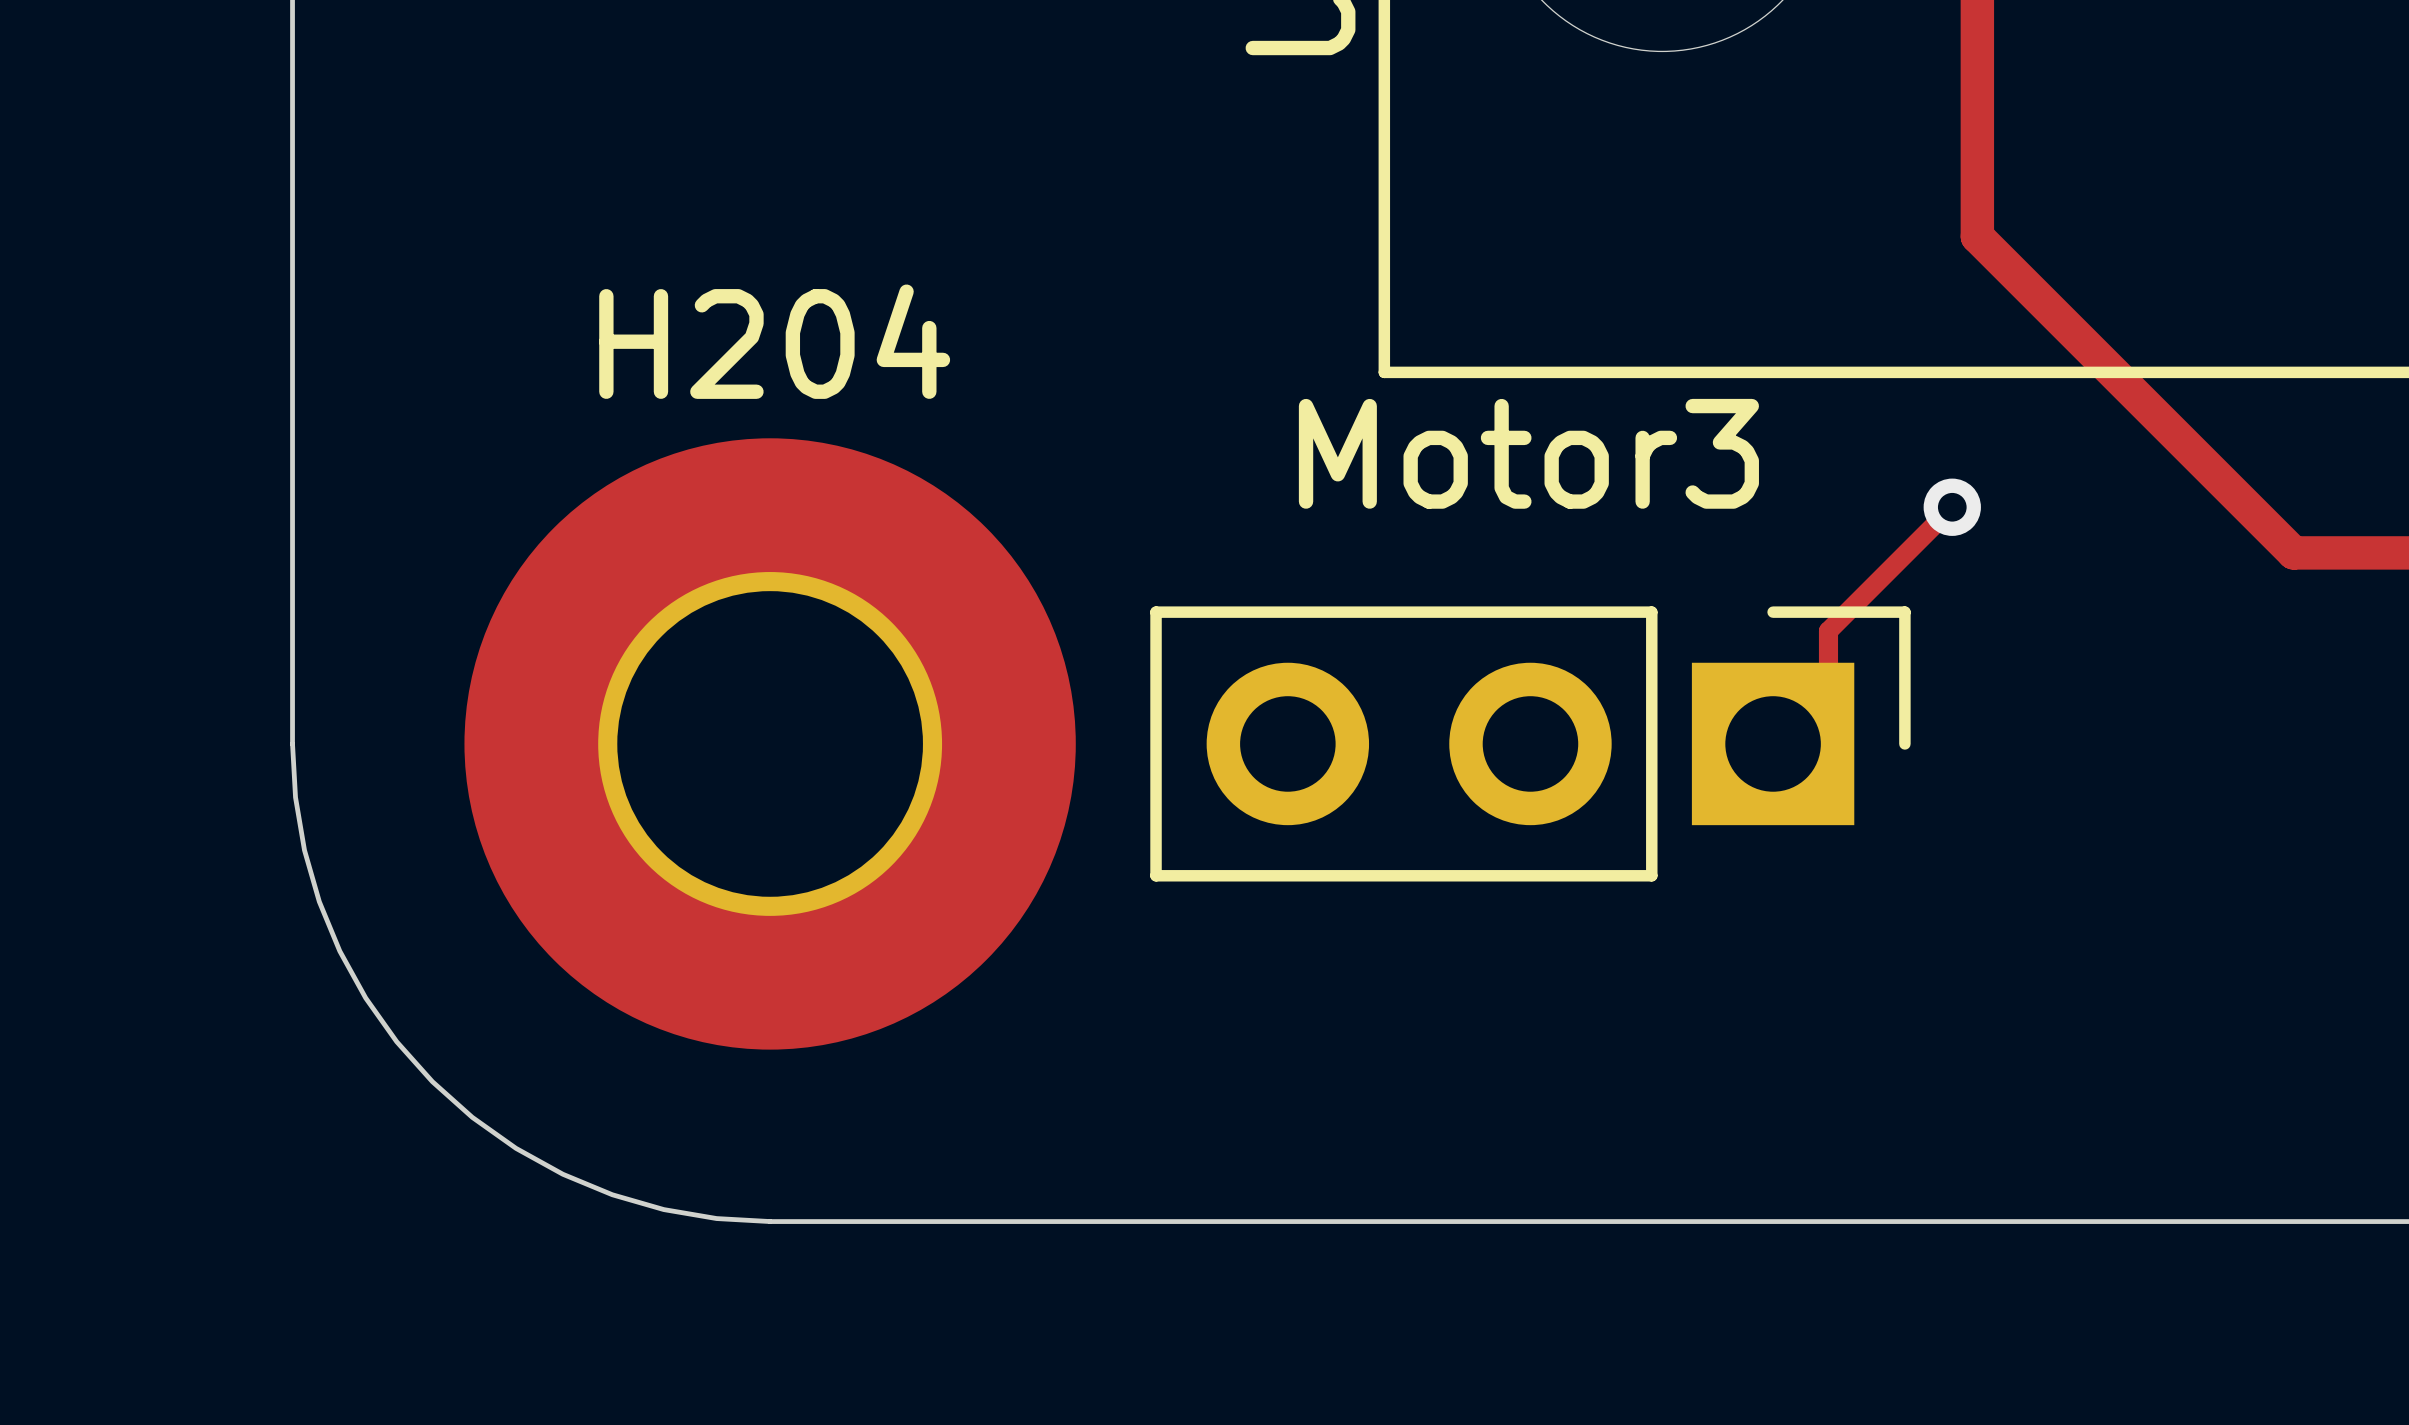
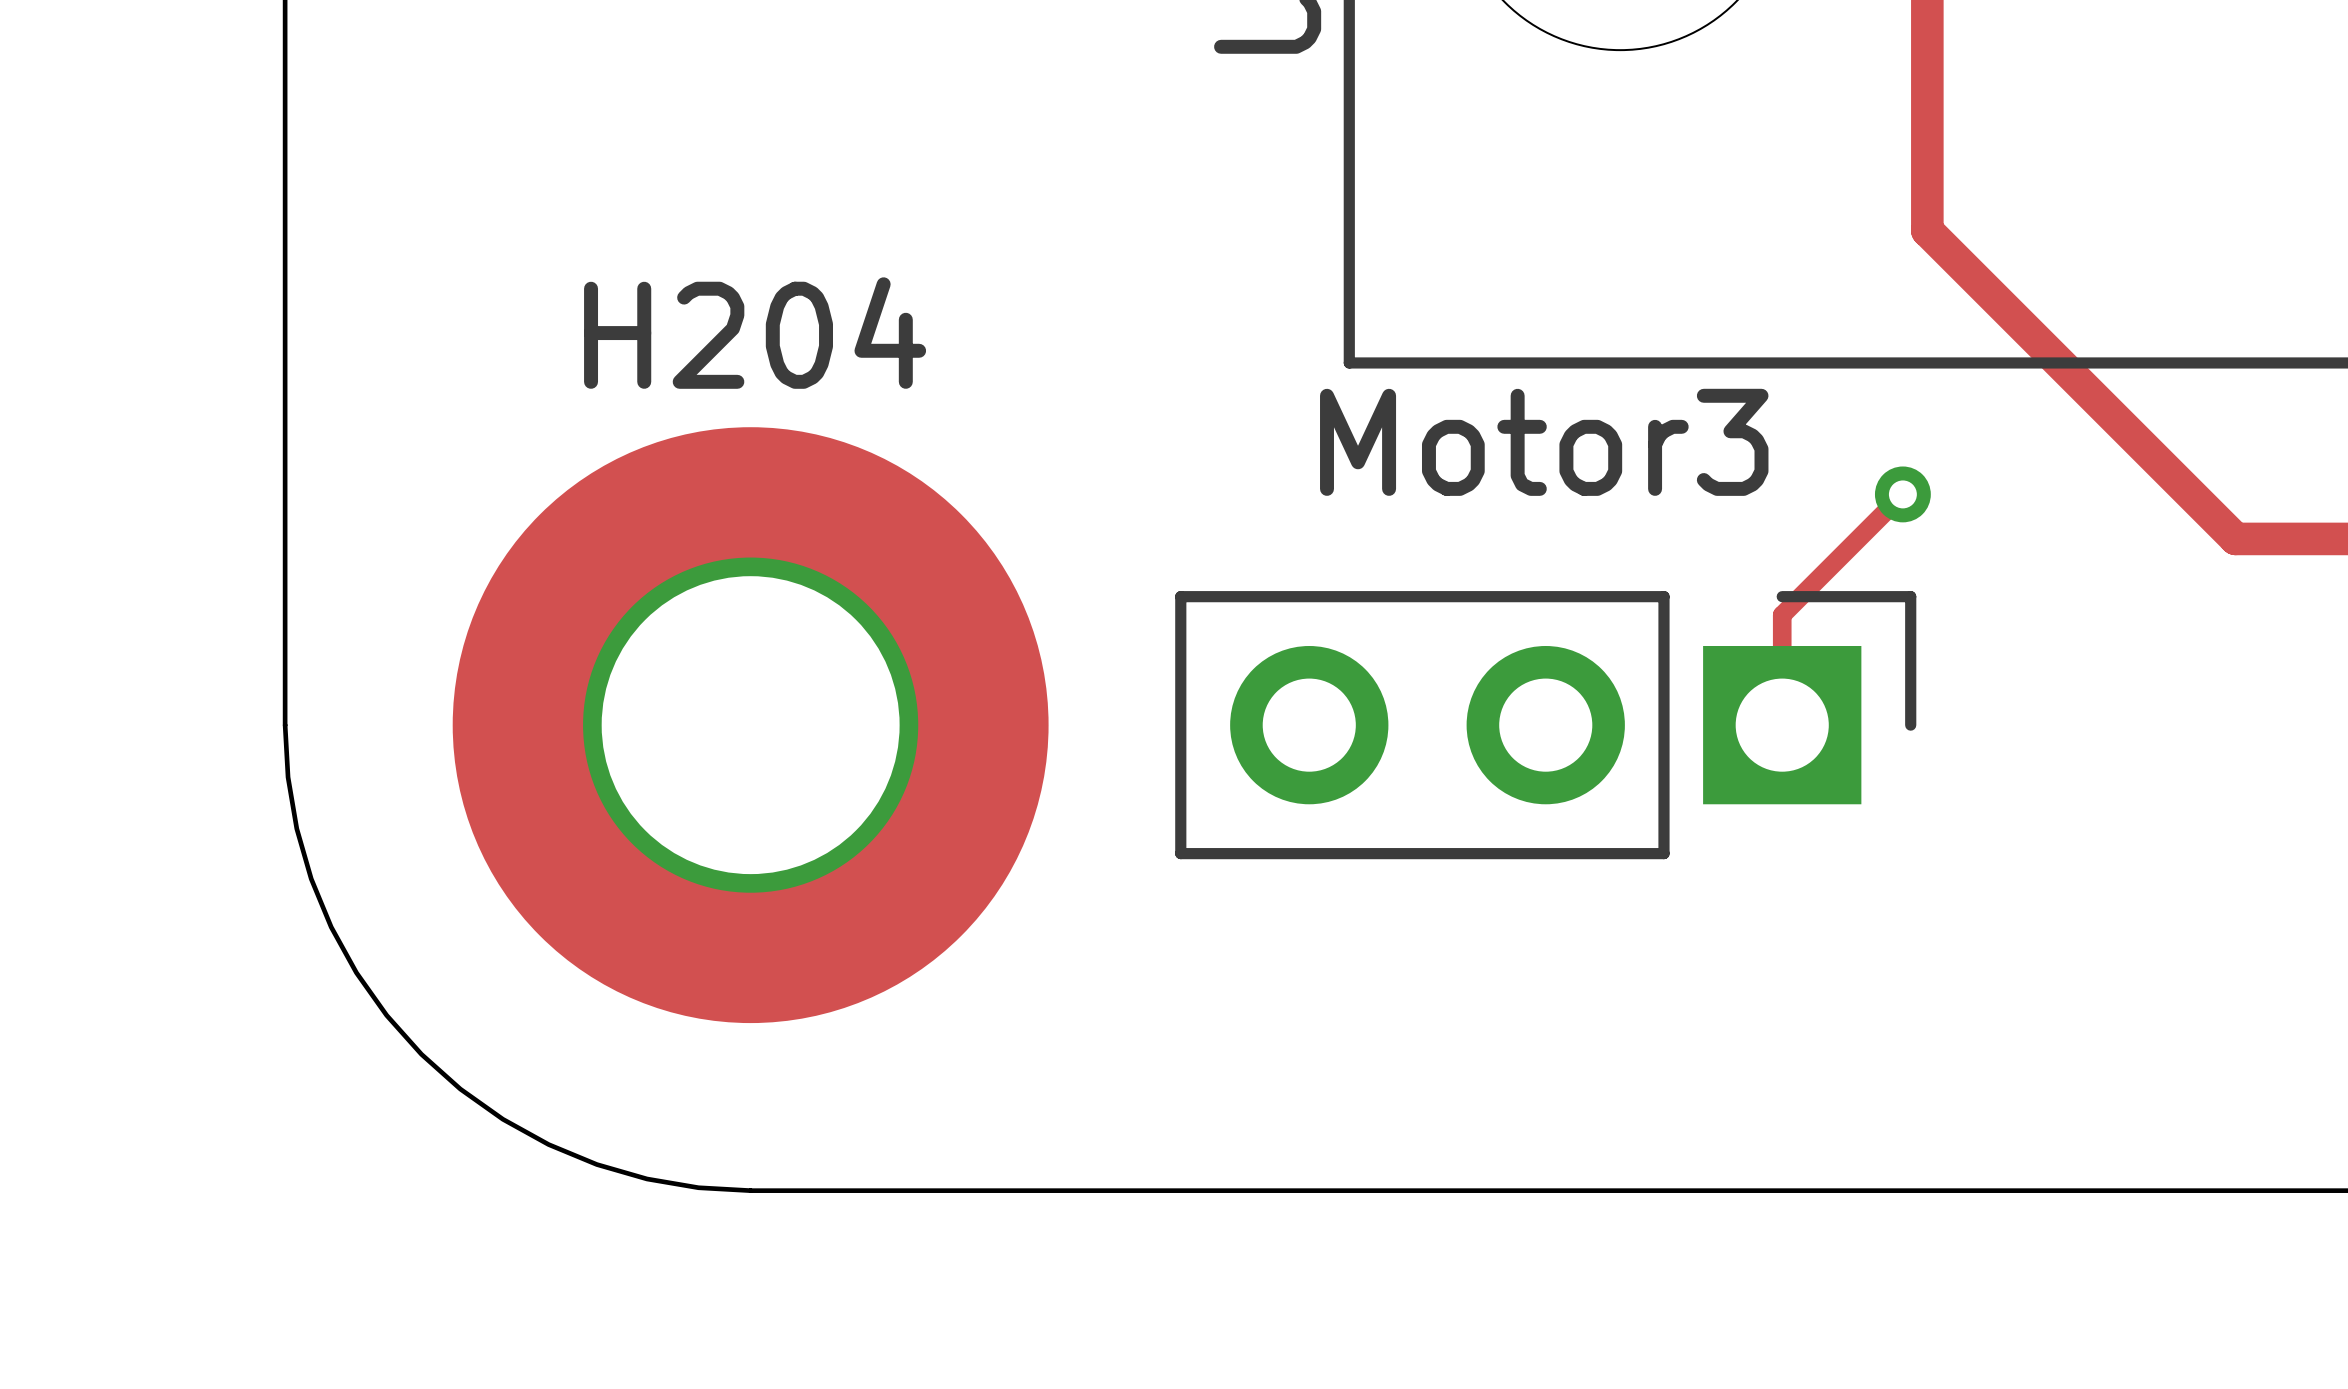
Motor3 position: (1530, 743) -> (1545, 725)

